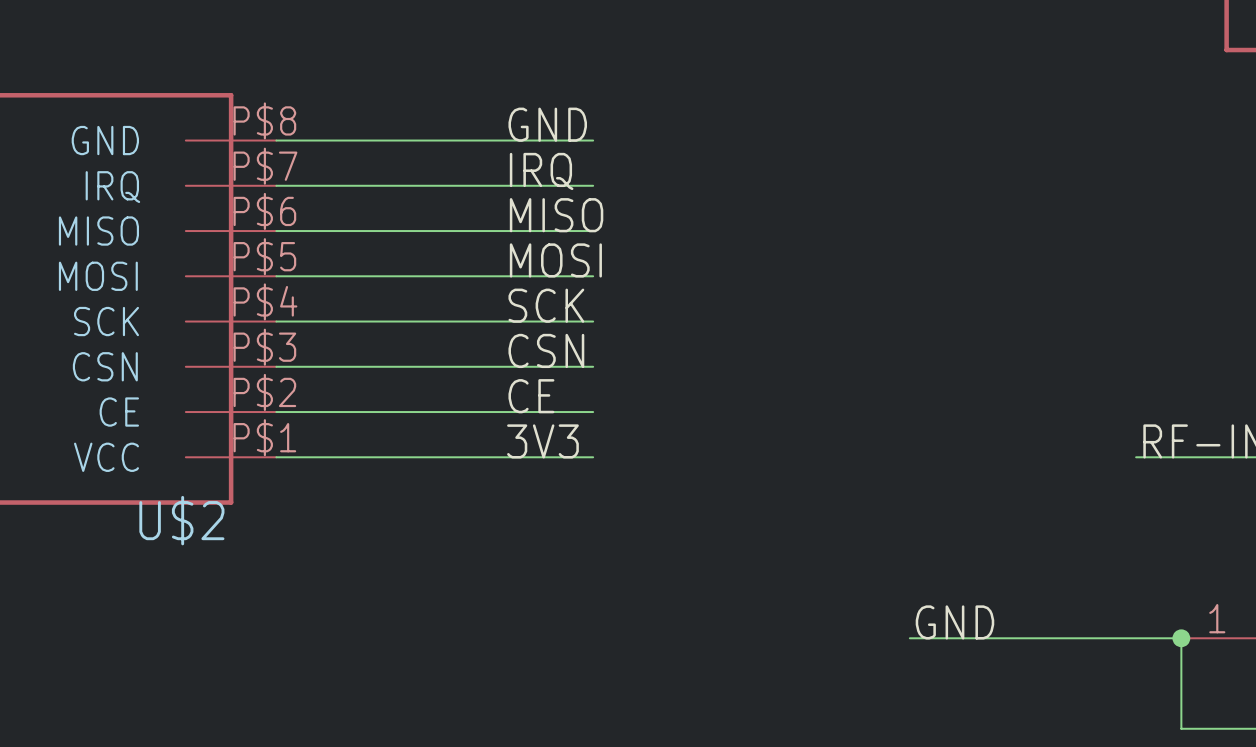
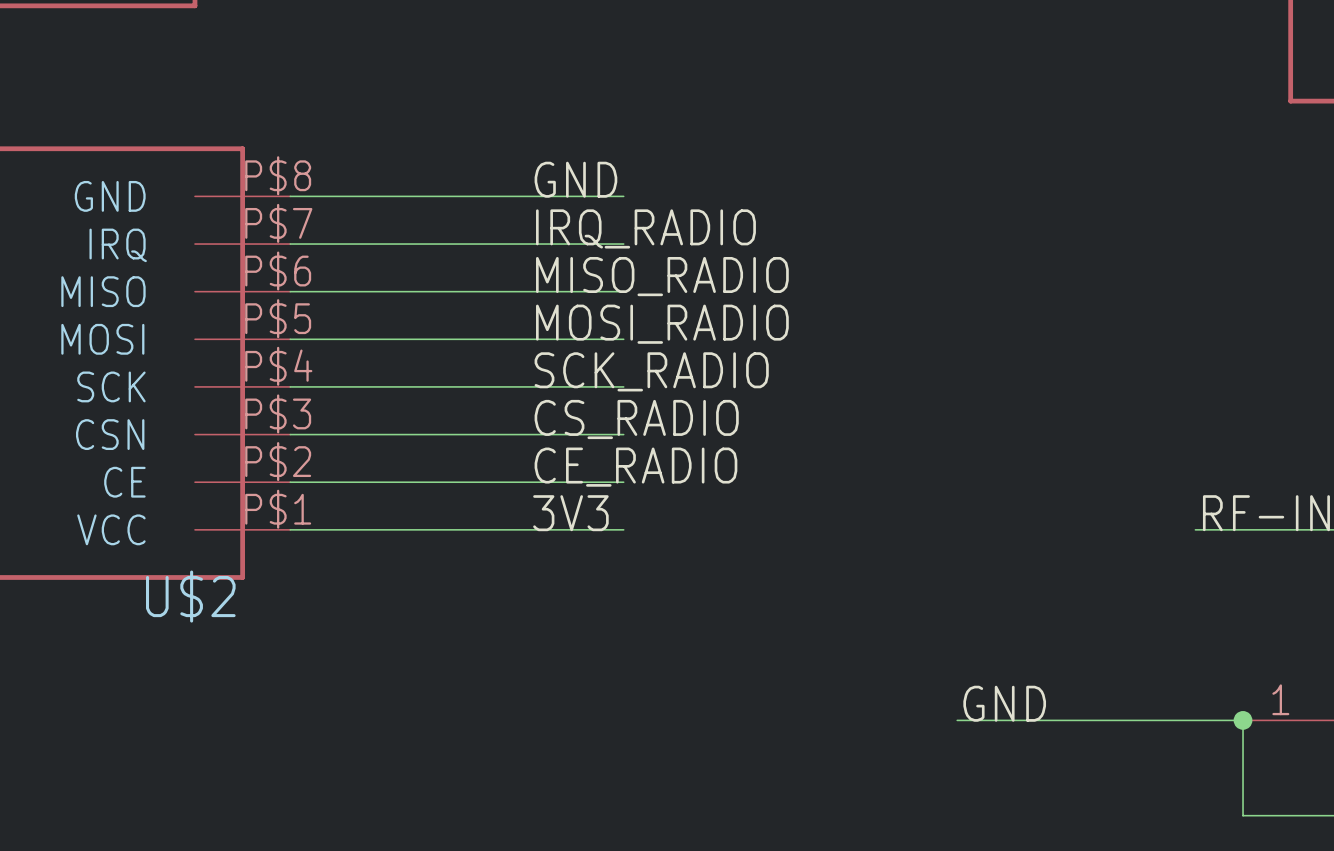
label: IRQ (541, 171) -> IRQ_RADIO (645, 228)
label: MISO (556, 215) -> MISO_RADIO (662, 276)
label: MOSI (555, 260) -> MOSI_RADIO (662, 324)
label: SCK (546, 305) -> SCK_RADIO (651, 371)
label: CSN (546, 350) -> CS_RADIO (636, 419)
label: CE (531, 396) -> CE_RADIO (635, 467)

